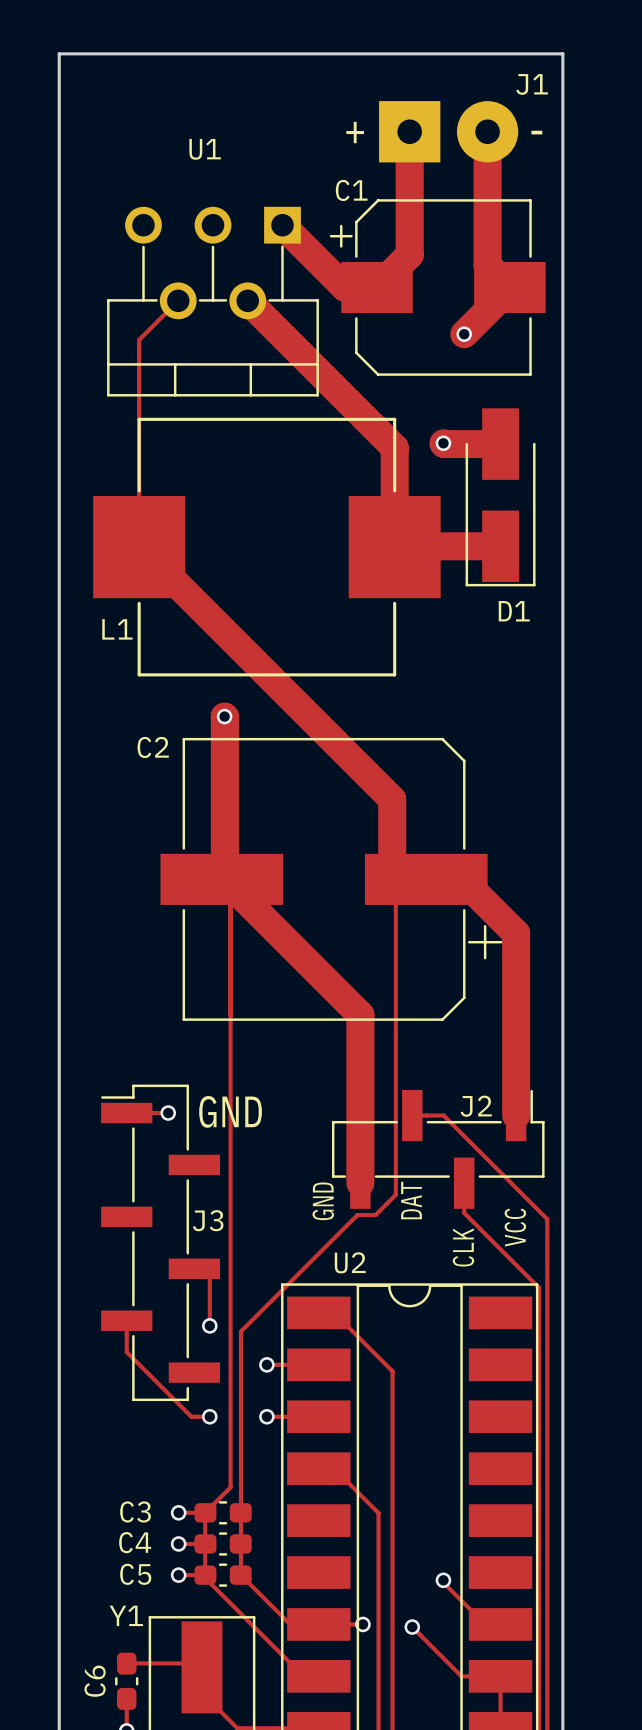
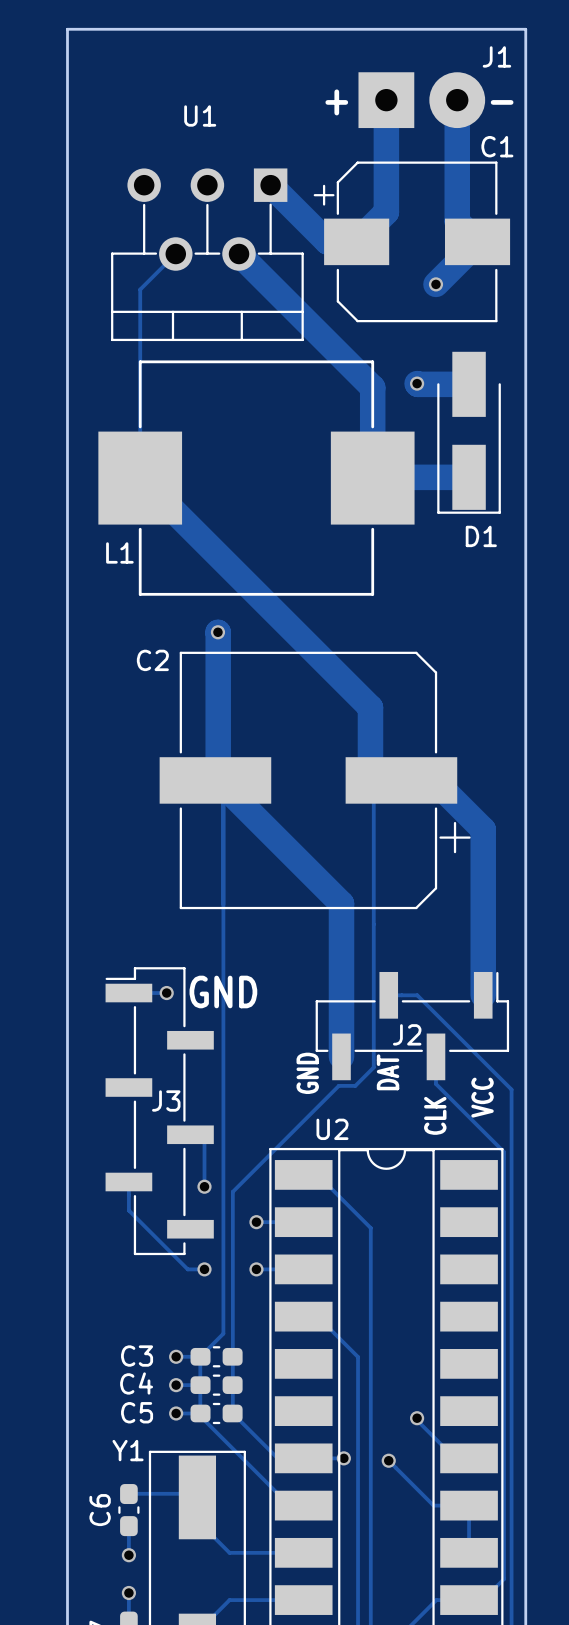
C1 name position: C1 (351, 190) -> C1 (497, 146)
J2 name position: J2 (476, 1106) -> J2 (407, 1034)
J3 name position: J3 (208, 1220) -> J3 (166, 1100)

